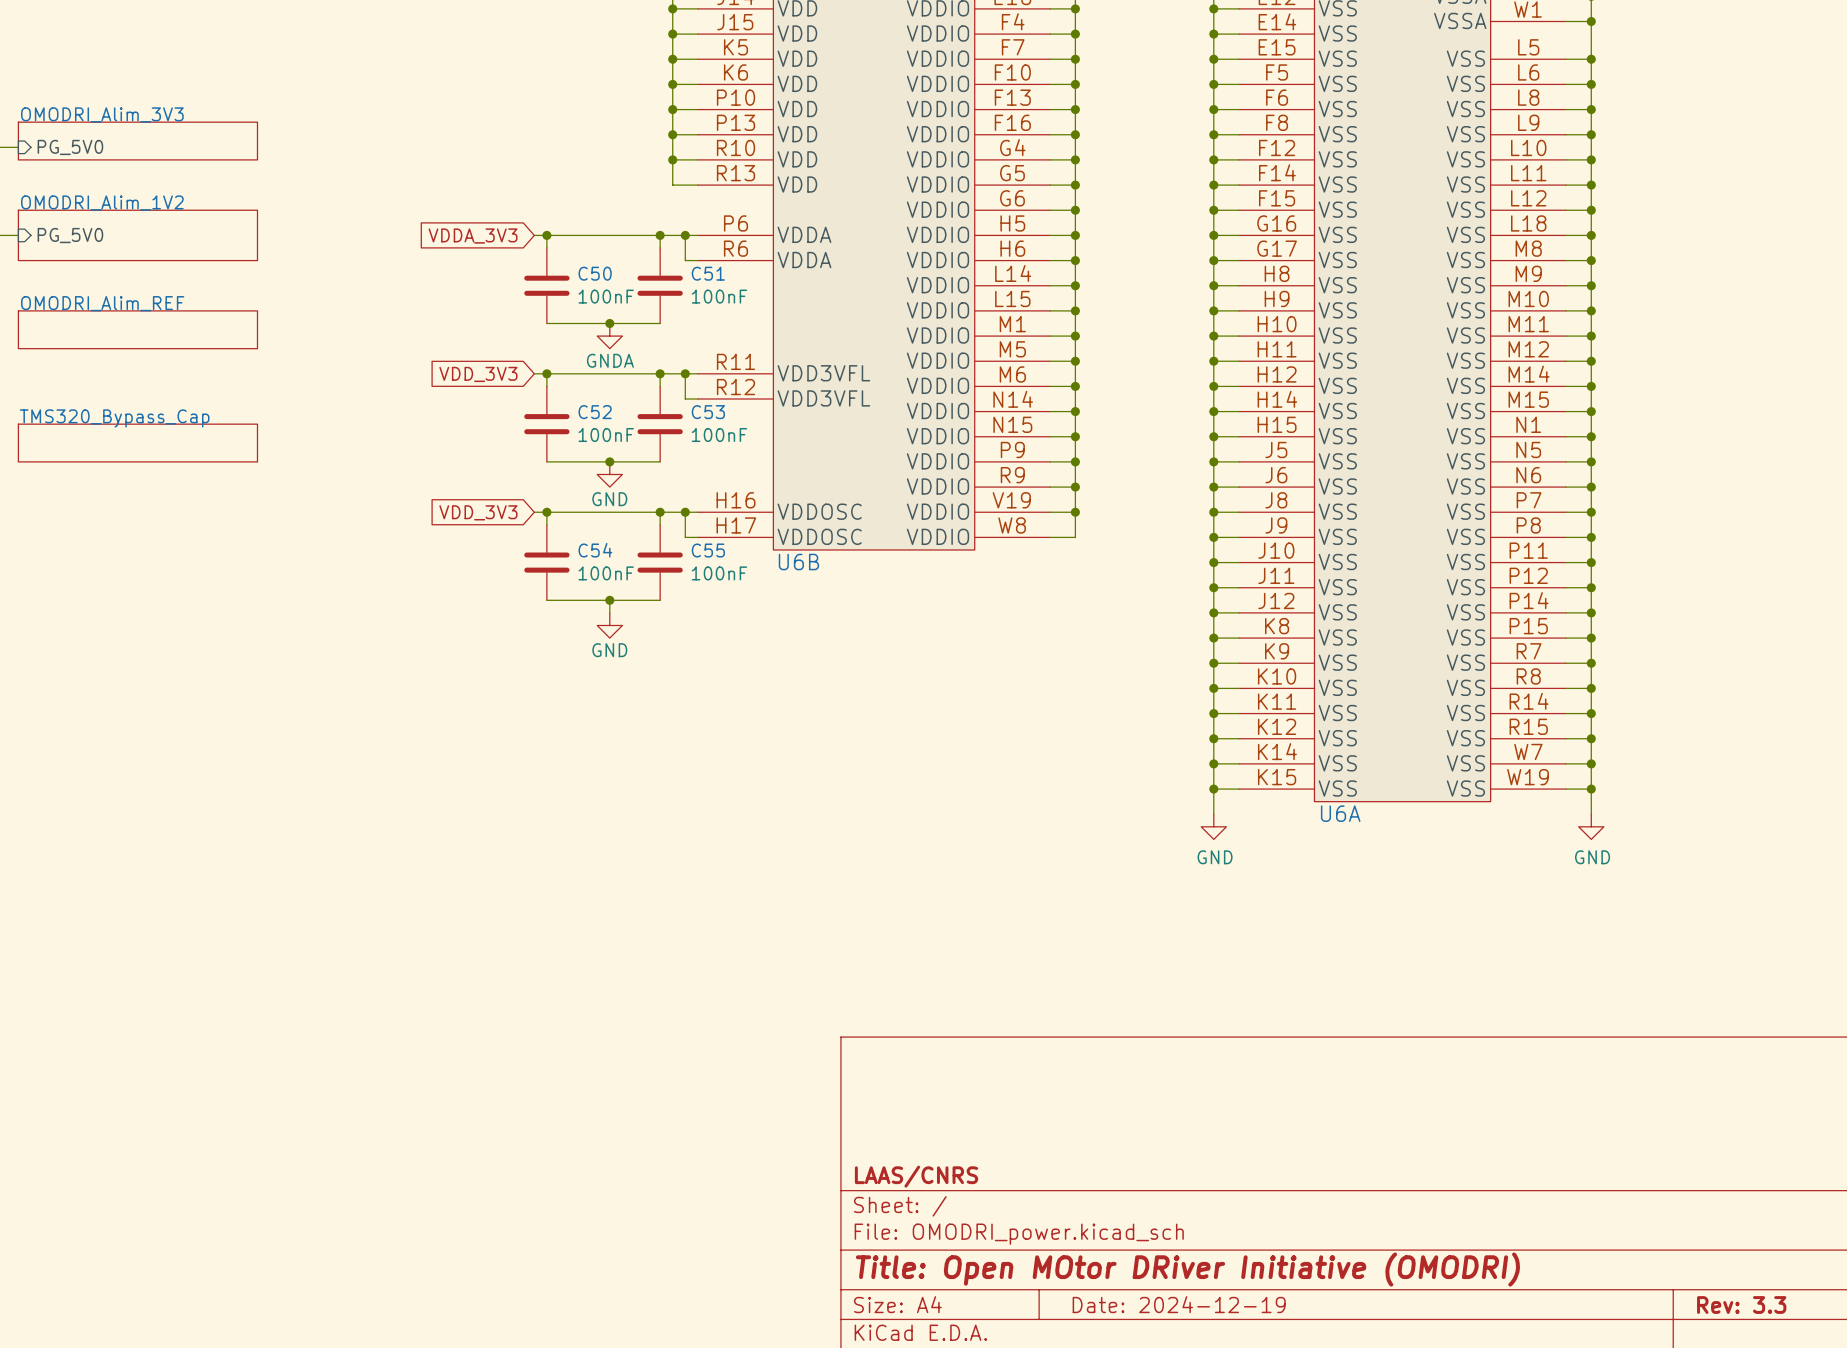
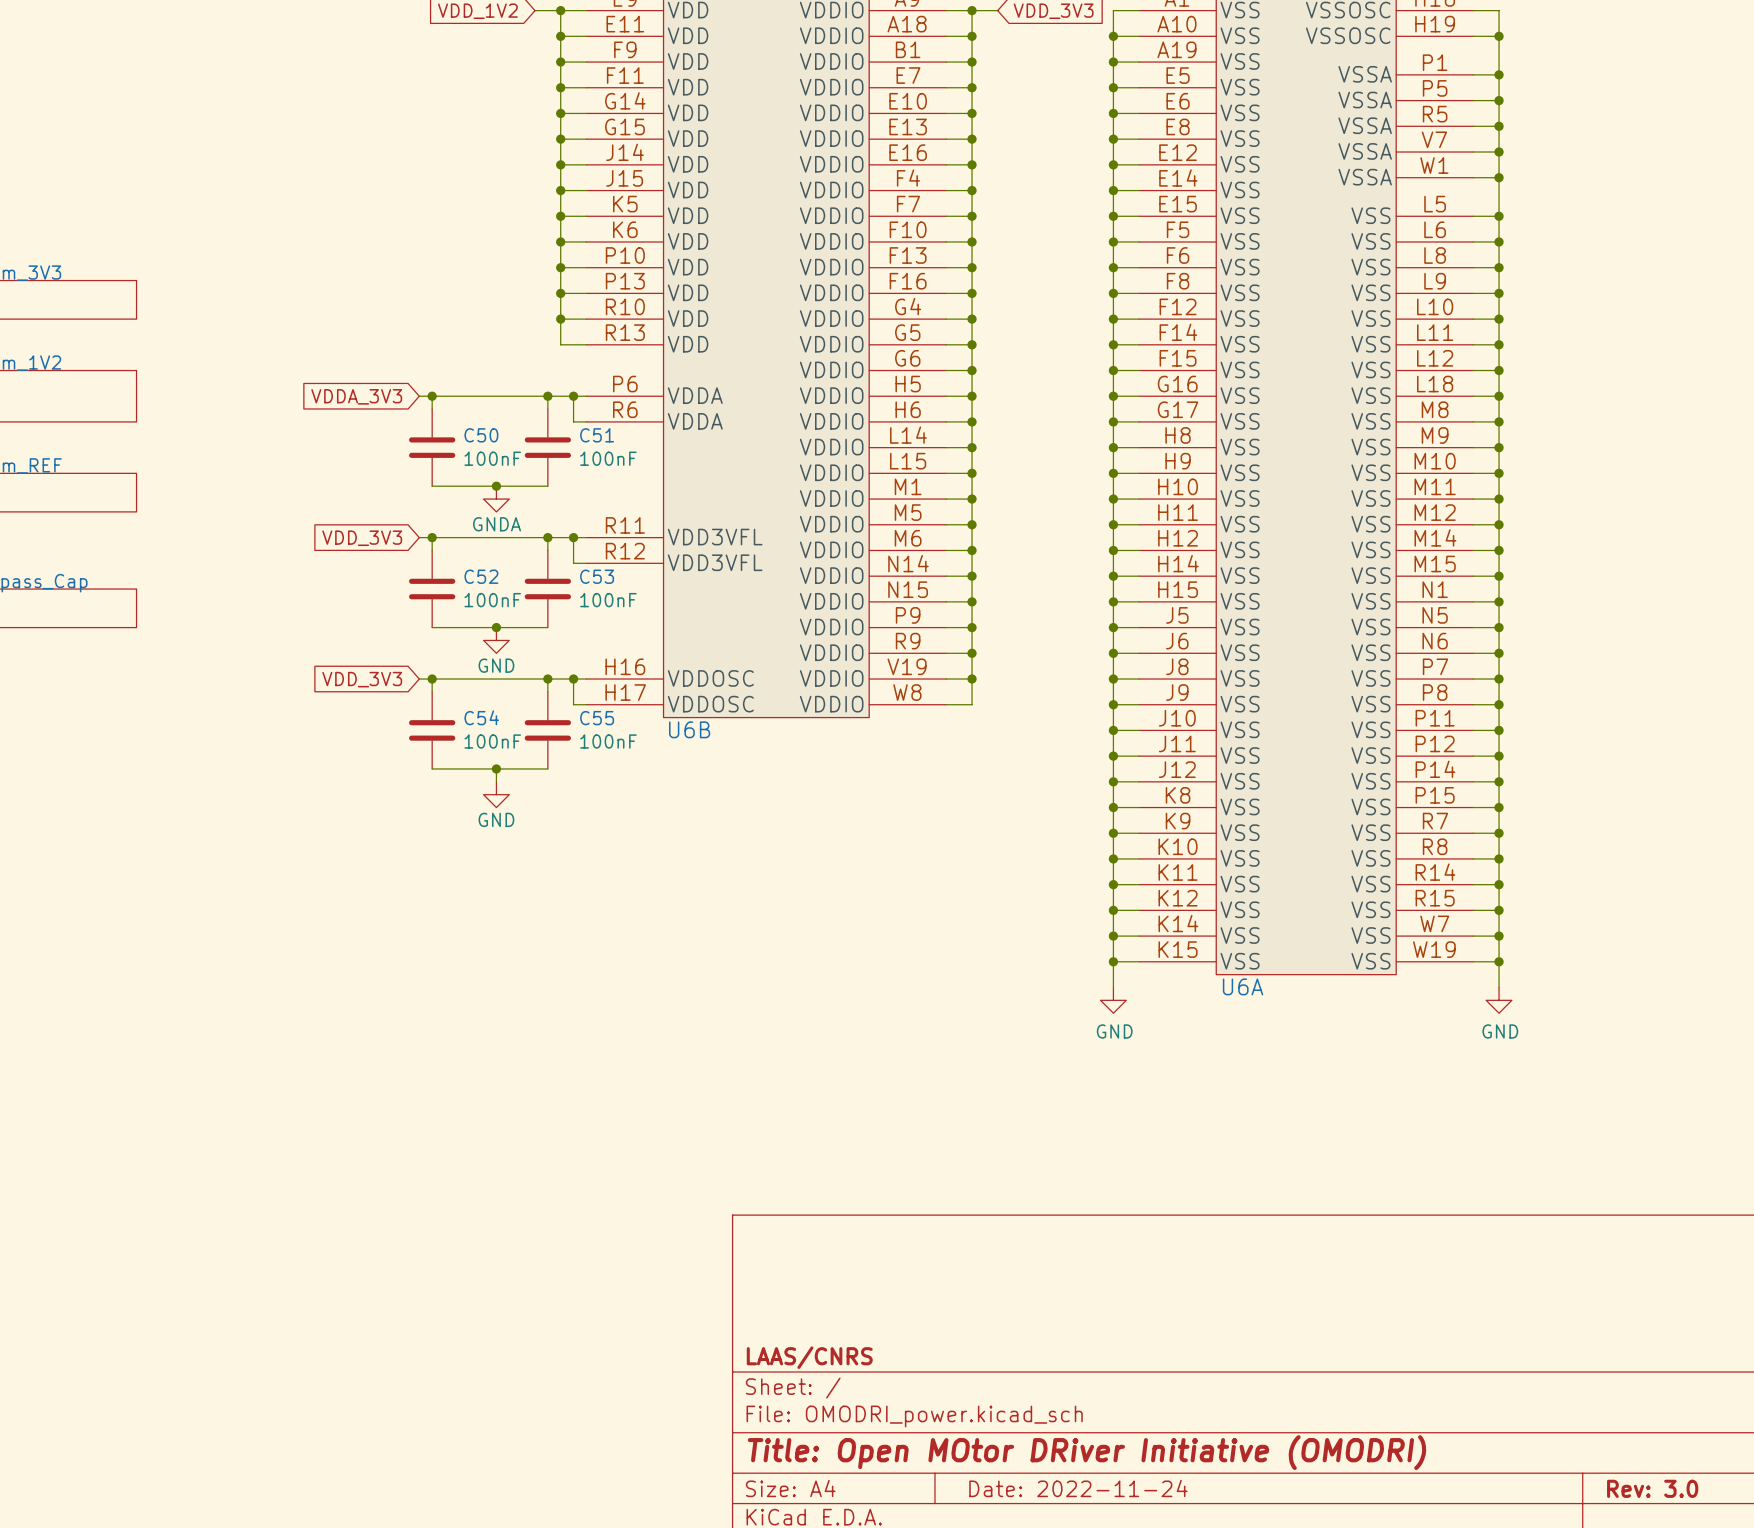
title block: Date: 2024-12-19 (1179, 1304) -> Date: 2022-11-24 (1078, 1488)
title block: Rev: 3.3 (1741, 1305) -> Rev: 3.0 (1652, 1488)

